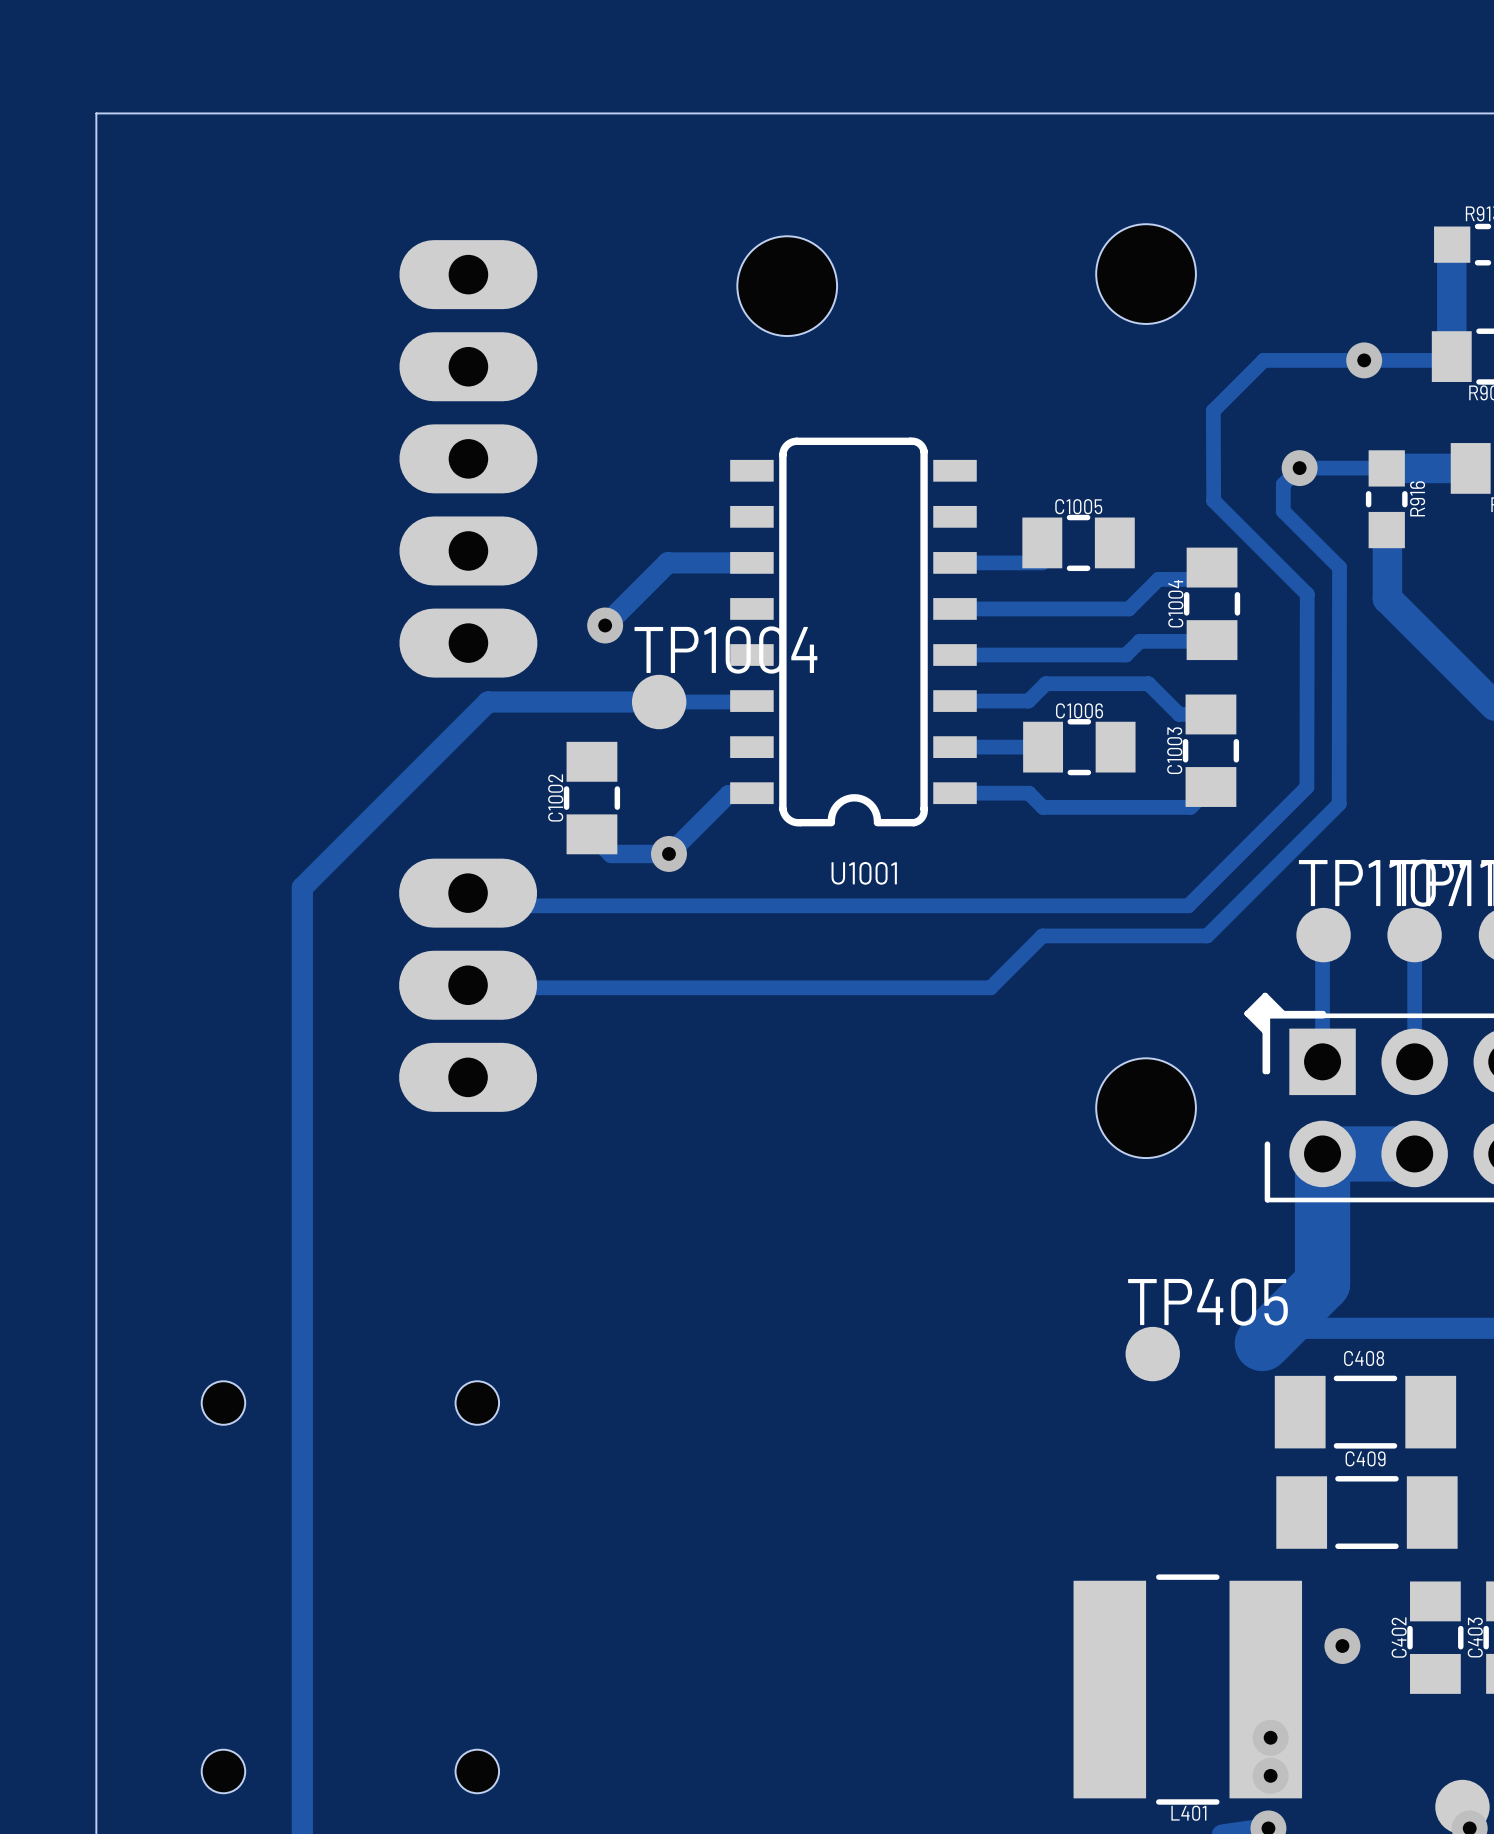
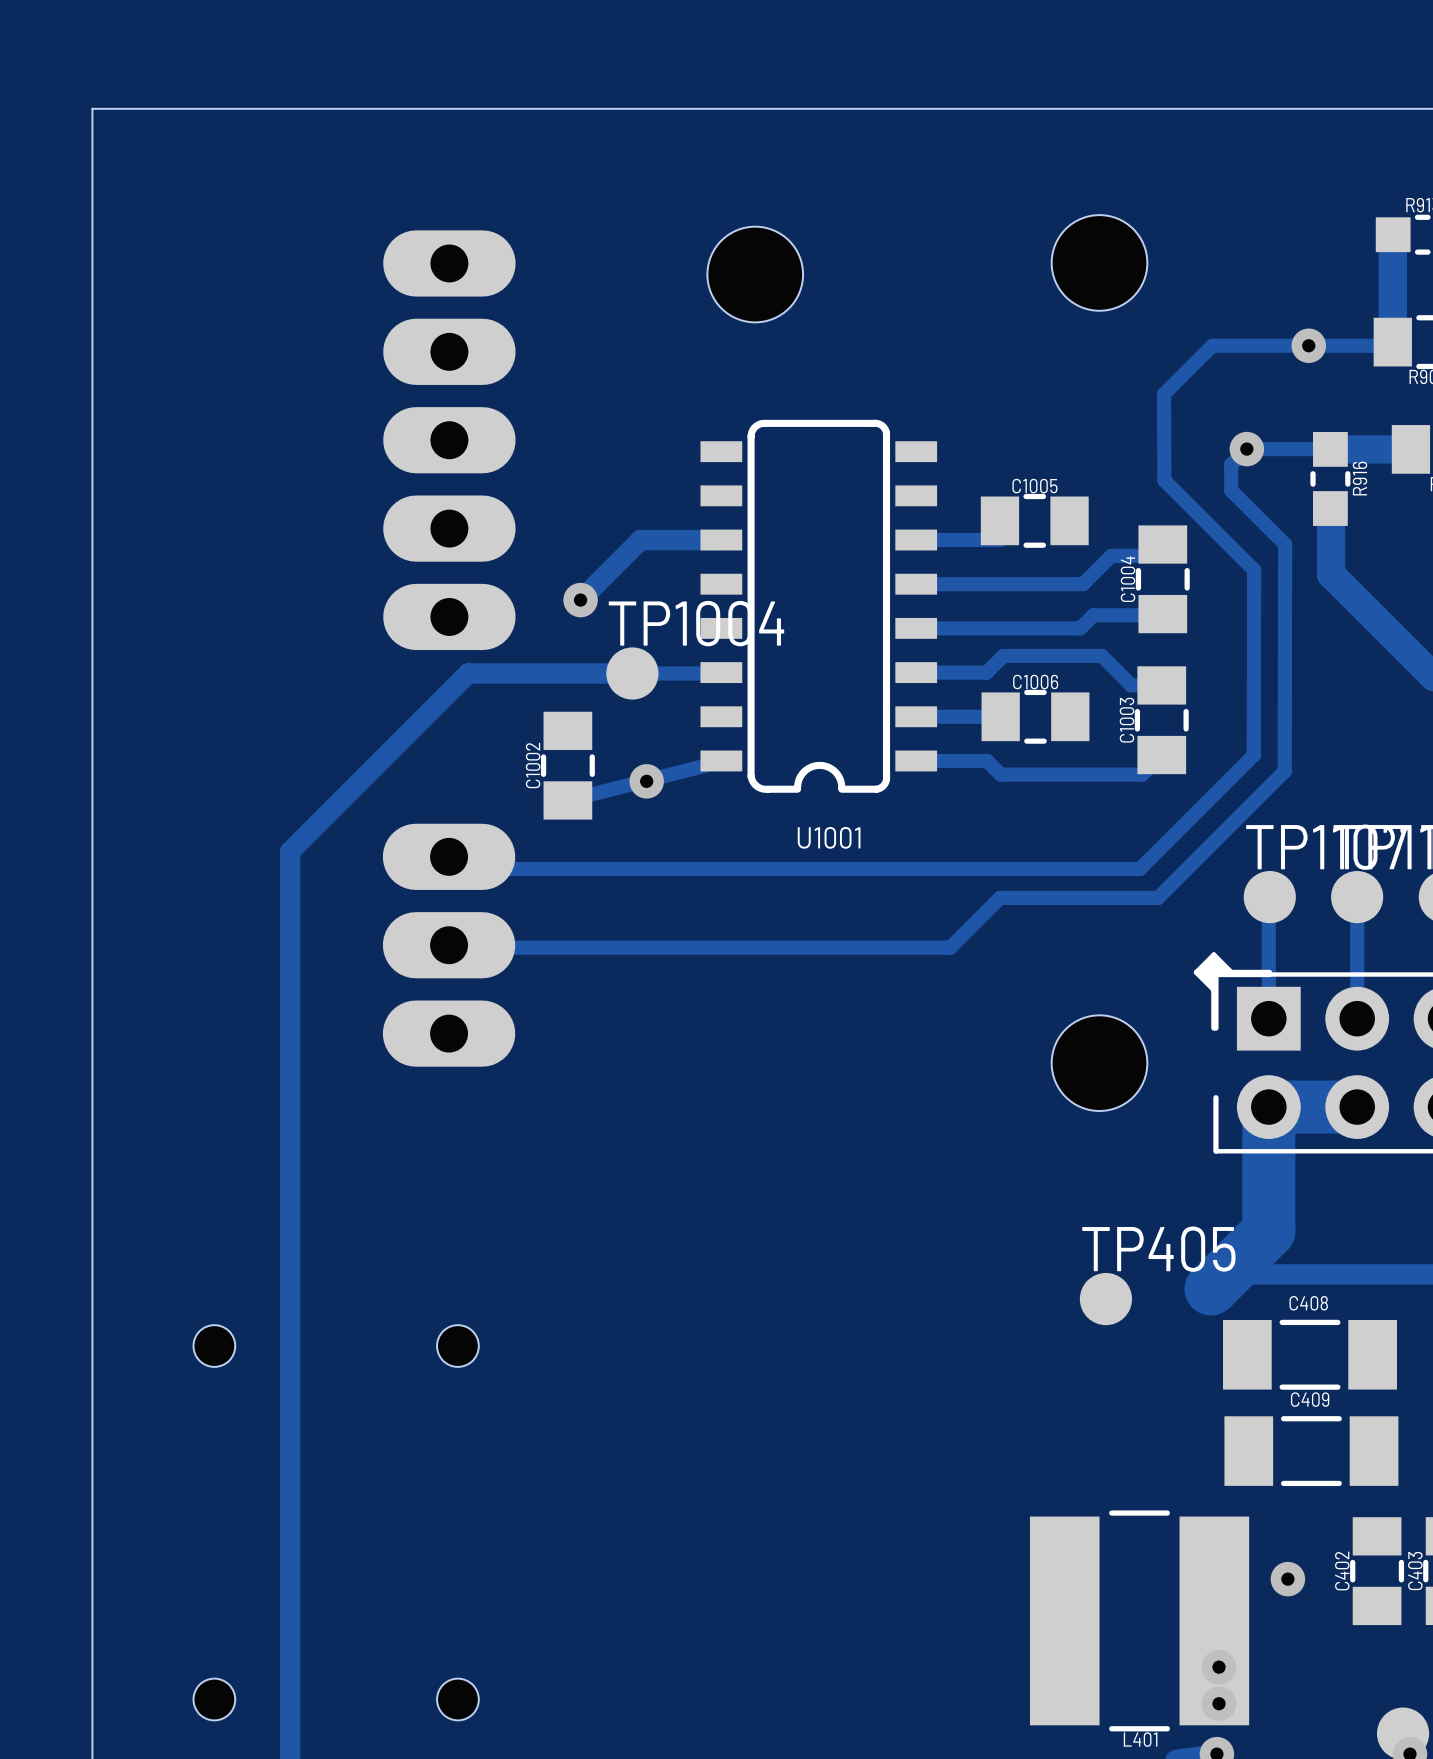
track: (750, 794) (728, 794) (668, 853) (611, 853) (591, 834) -> (720, 761) (567, 800)
via position: (668, 853) -> (646, 781)

